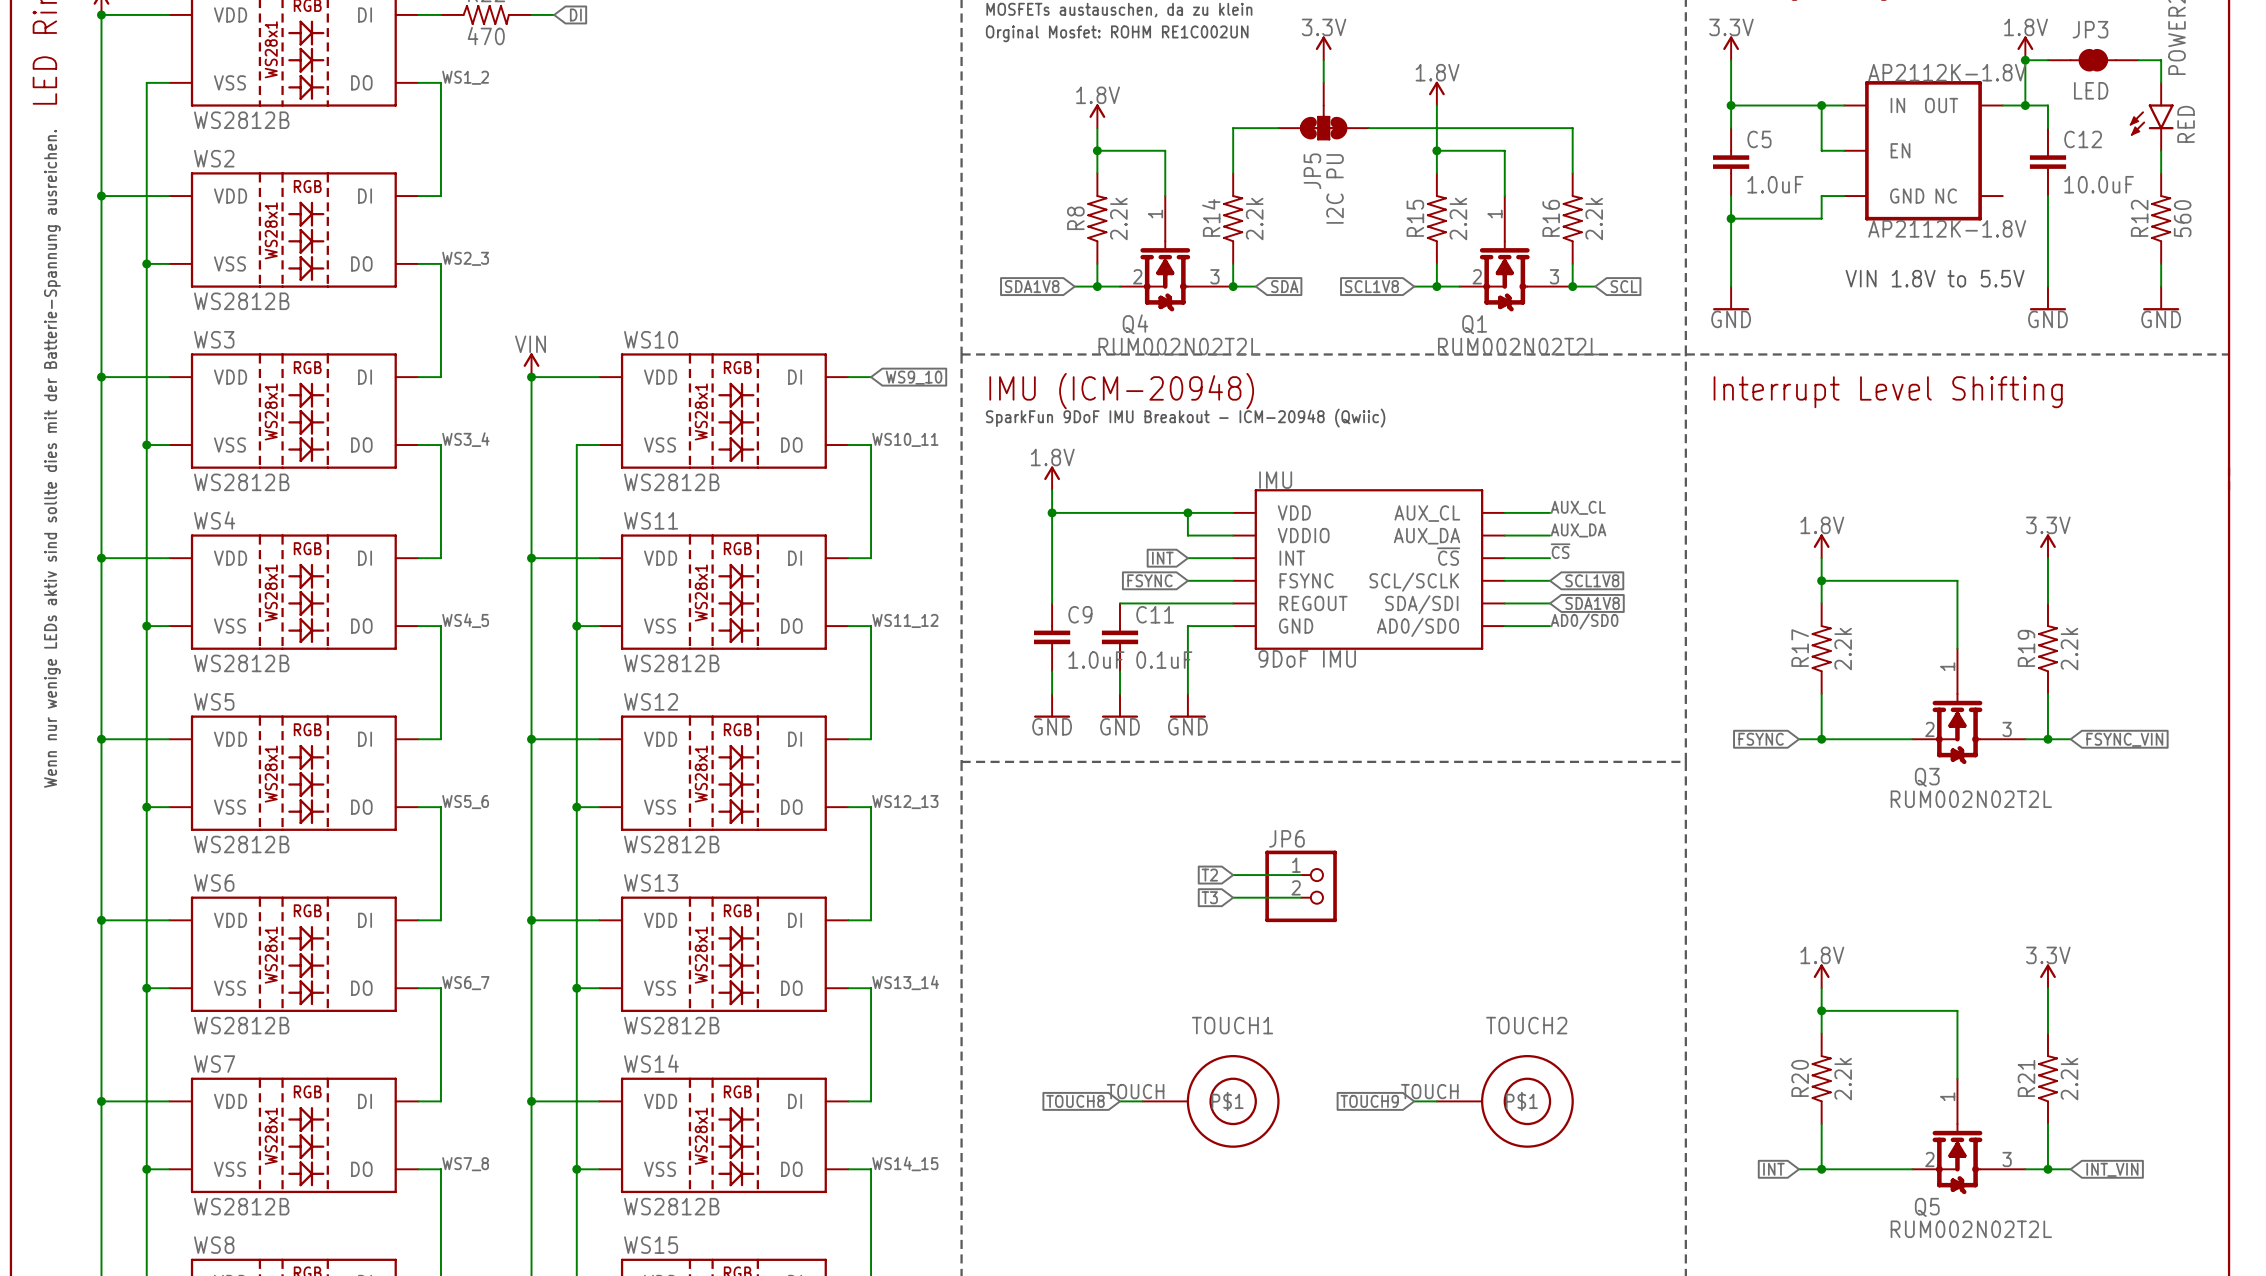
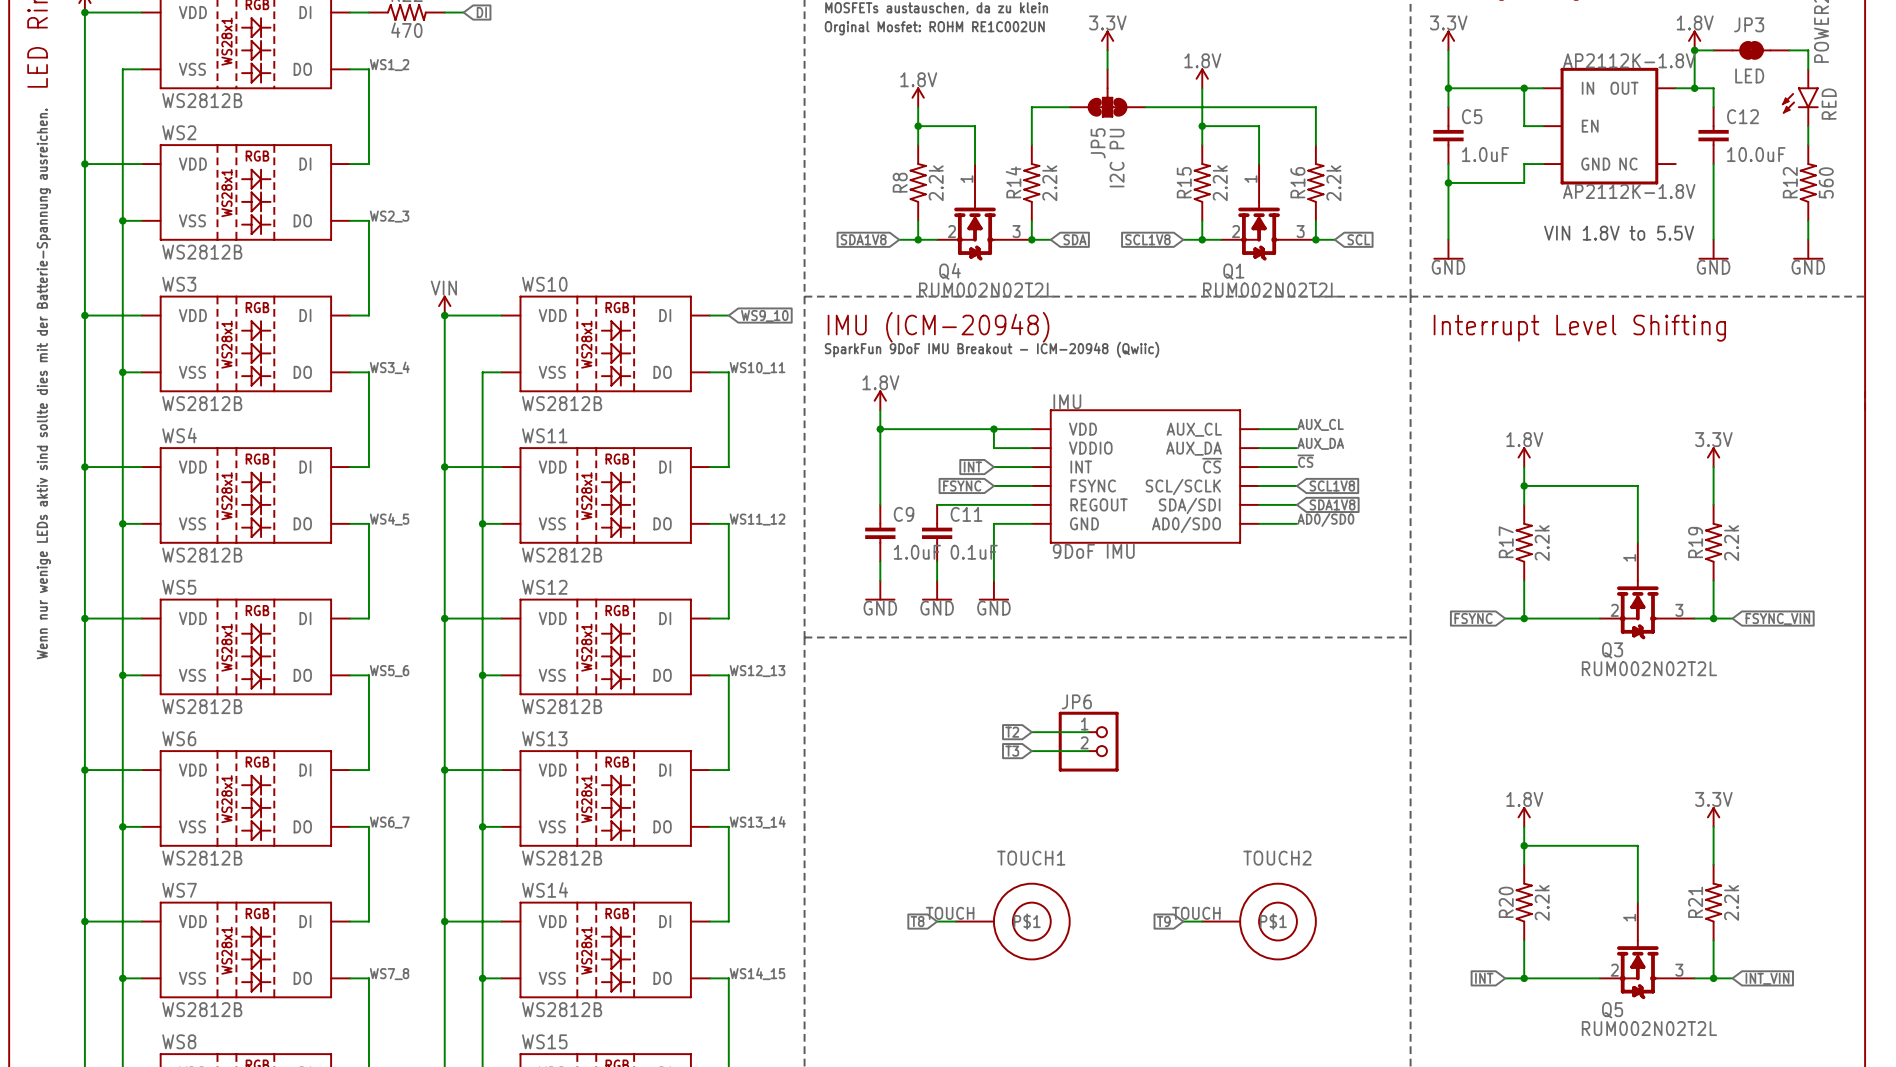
global label: TOUCH8 (1075, 1101) -> T8 (917, 921)
global label: TOUCH9 (1369, 1101) -> T9 (1163, 921)

